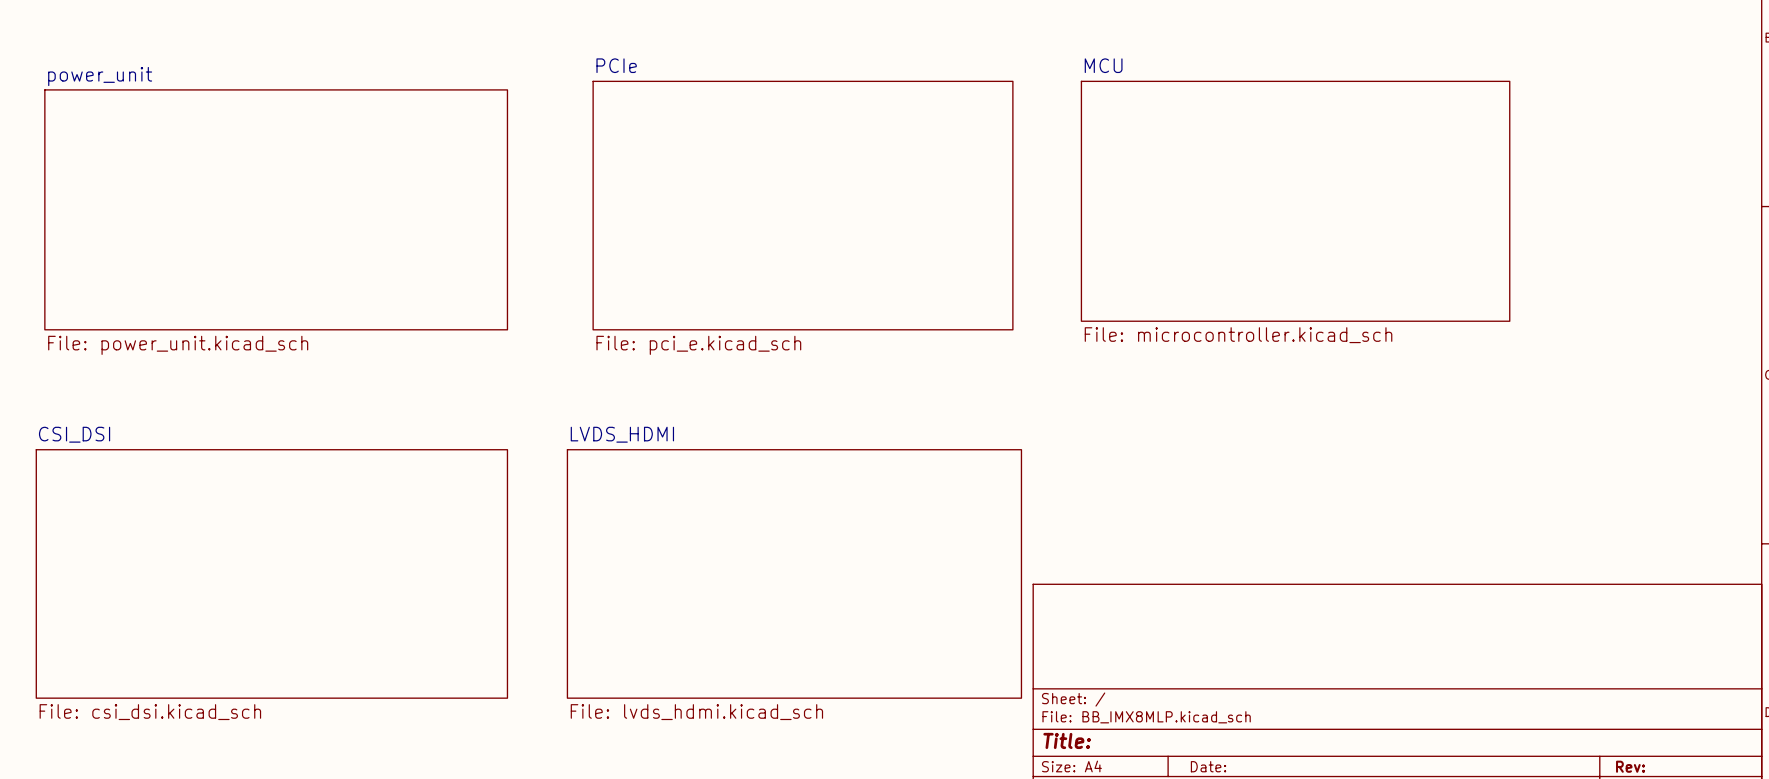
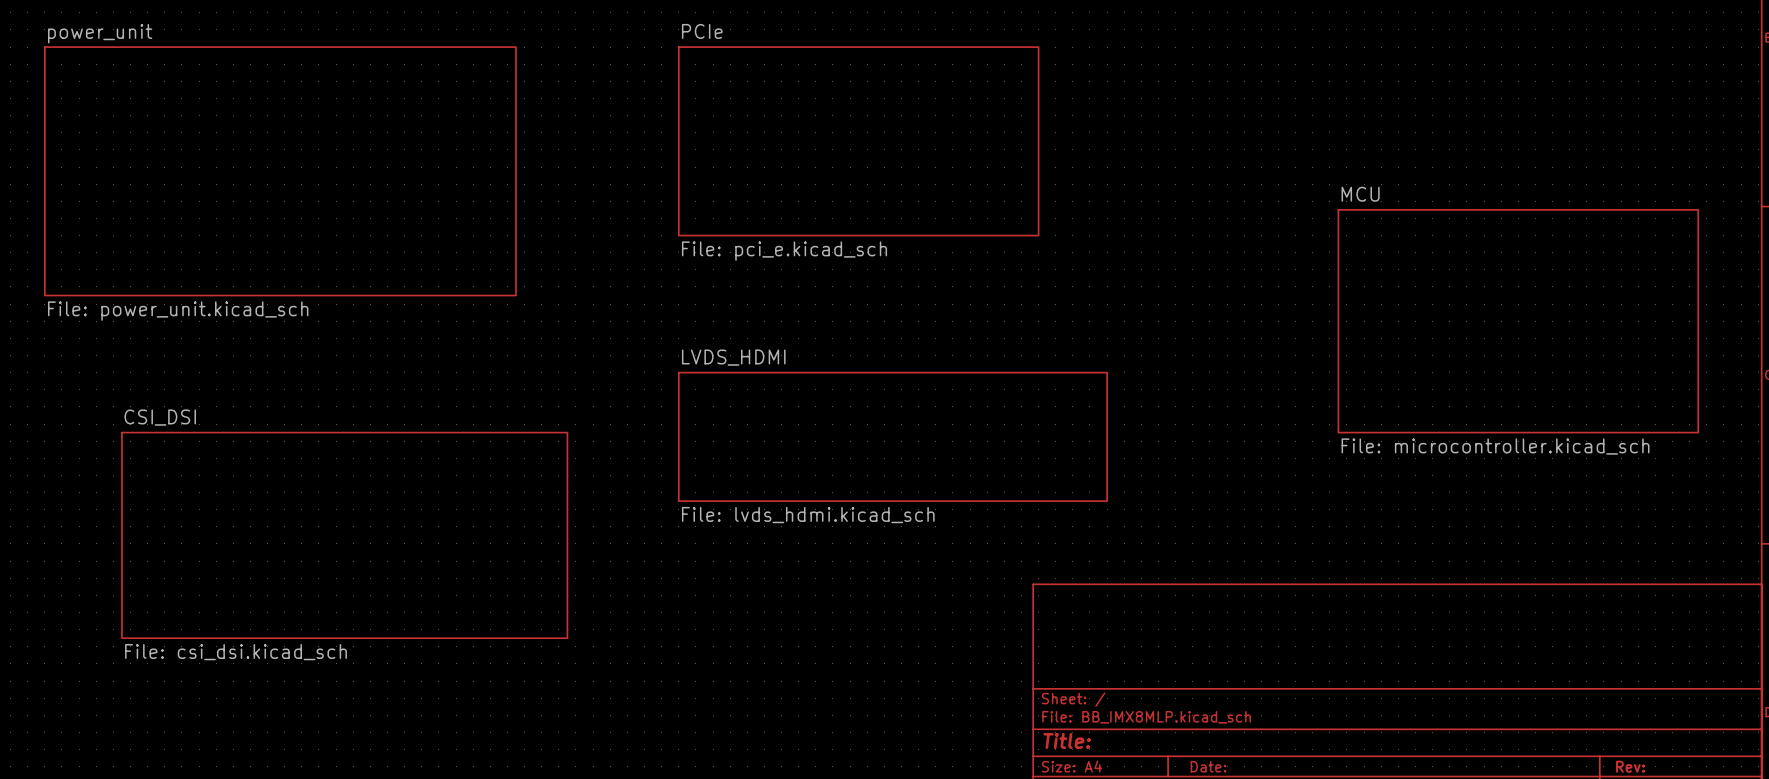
sheet PCIe: none -> File: pci_e.kicad_sch (858, 141)
sheet power_unit: none -> File: power_unit.kicad_sch (280, 171)
sheet MCU: File: microcontroller.kicad_sch (1295, 201) -> none
sheet PCIe: File: pci_e.kicad_sch (803, 205) -> none
sheet power_unit: File: power_unit.kicad_sch (276, 209) -> none
sheet MCU: none -> File: microcontroller.kicad_sch (1518, 321)
sheet LVDS_HDMI: none -> File: lvds_hdmi.kicad_sch (892, 436)
sheet CSI_DSI: none -> File: csi_dsi.kicad_sch (344, 535)
sheet CSI_DSI: File: csi_dsi.kicad_sch (271, 573) -> none
sheet LVDS_HDMI: File: lvds_hdmi.kicad_sch (794, 573) -> none

